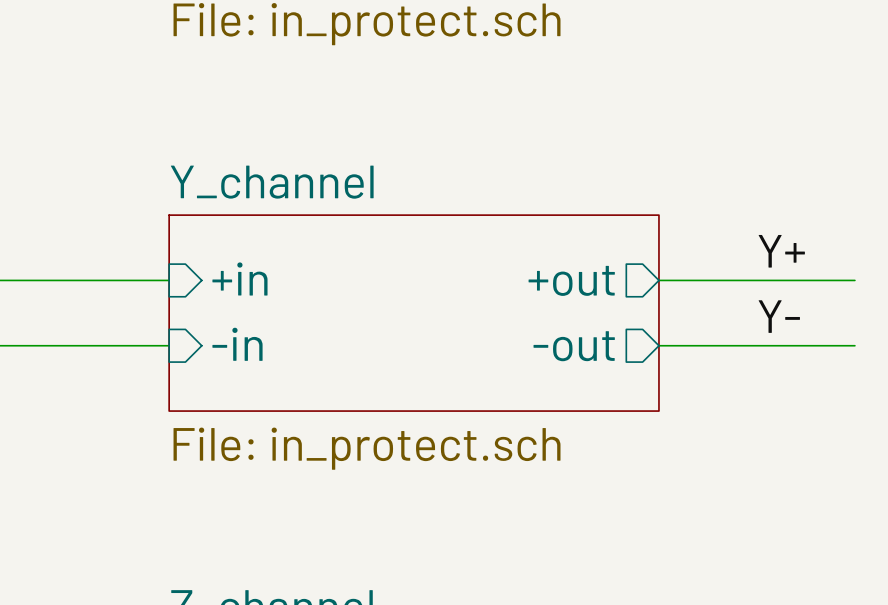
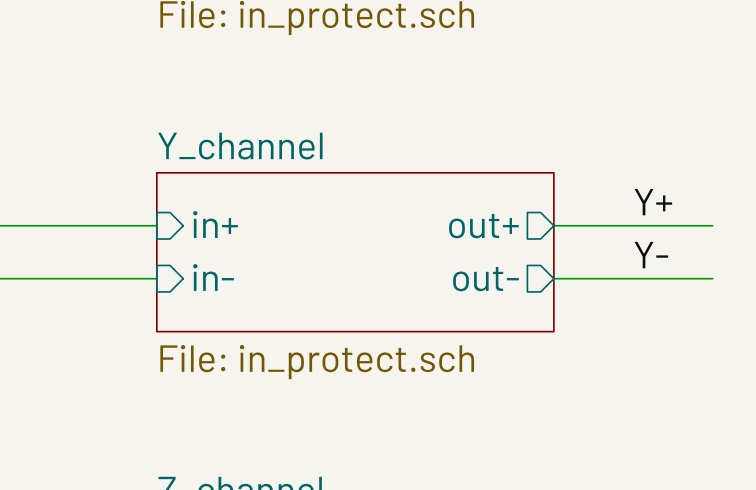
sheet pin: +in (239, 278) -> in+ (215, 224)
sheet pin: +out (571, 280) -> out+ (483, 226)
sheet pin: -in (237, 344) -> in- (213, 277)
sheet pin: -out (574, 346) -> out- (485, 279)

